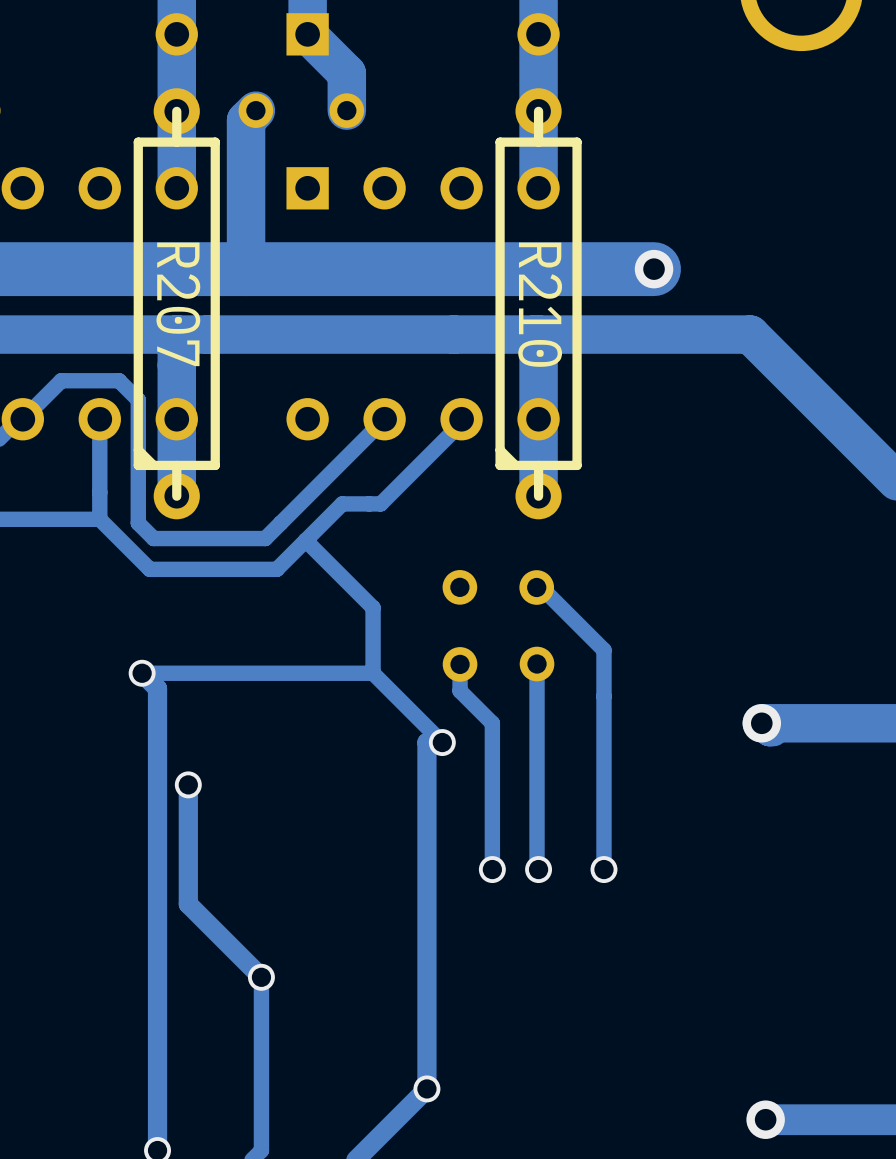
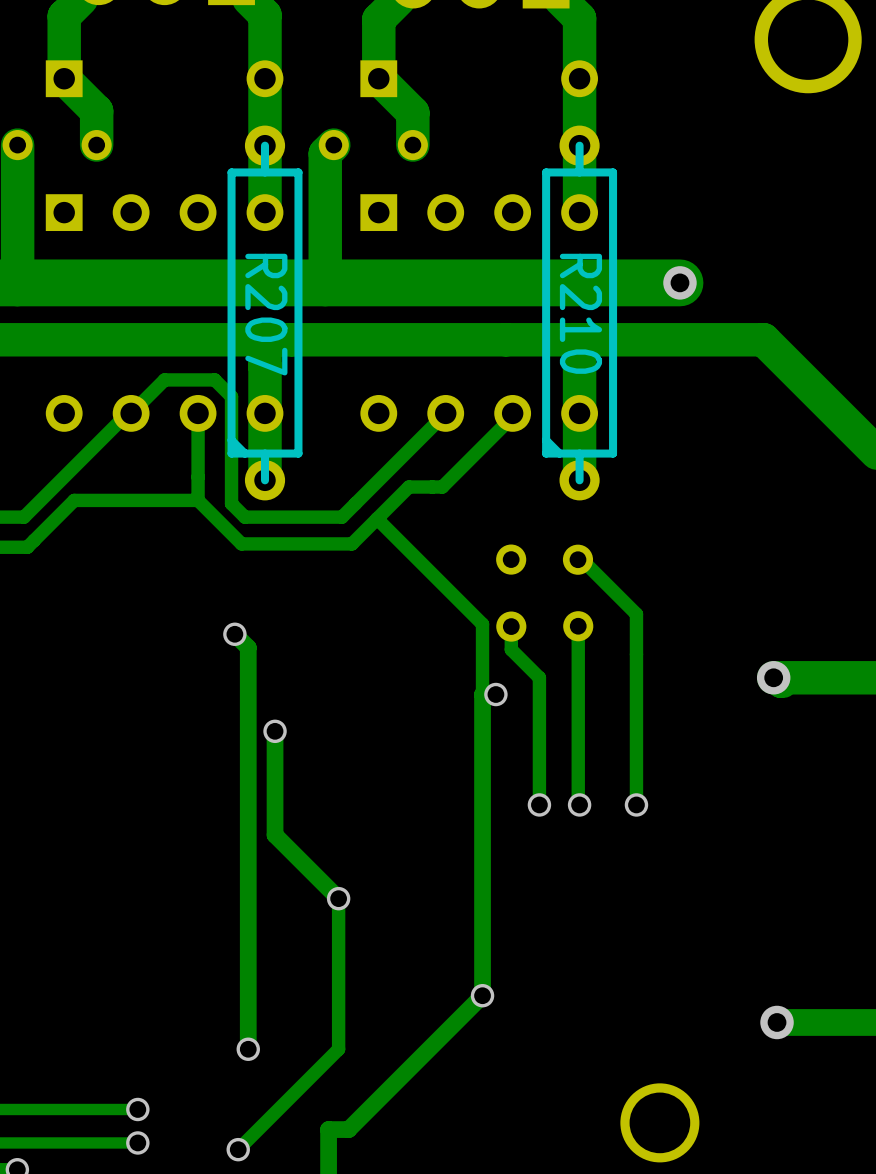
track: (373, 607) (373, 673) -> (435, 577) (482, 624) (482, 694)
track: (373, 673) (142, 673) -> none
track: (373, 673) (442, 742) -> none

